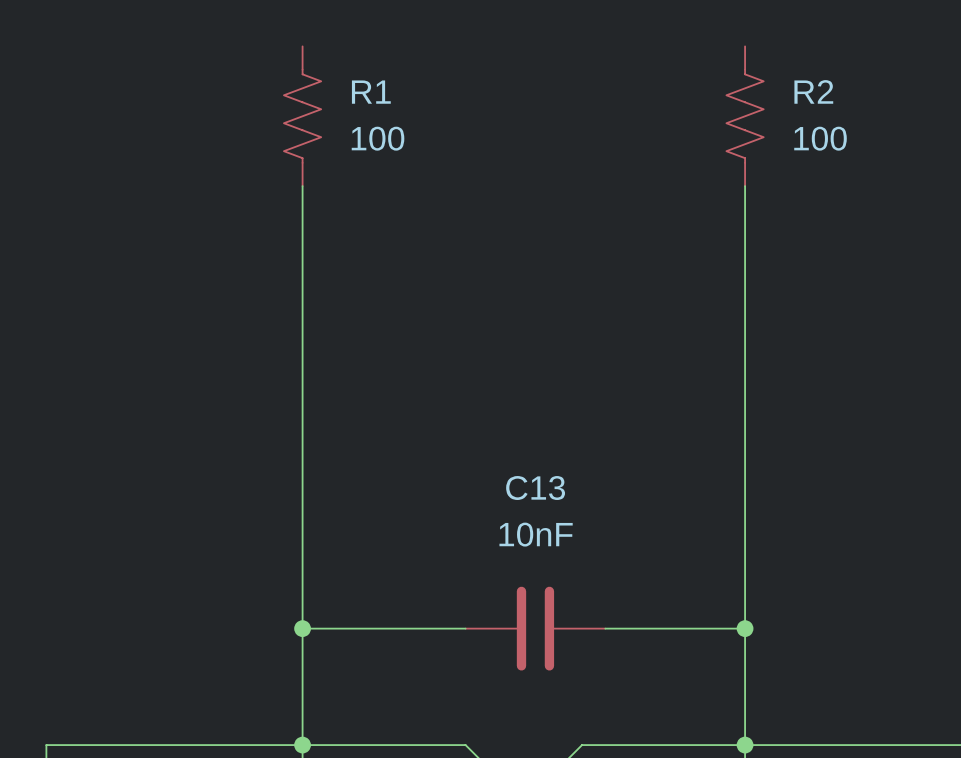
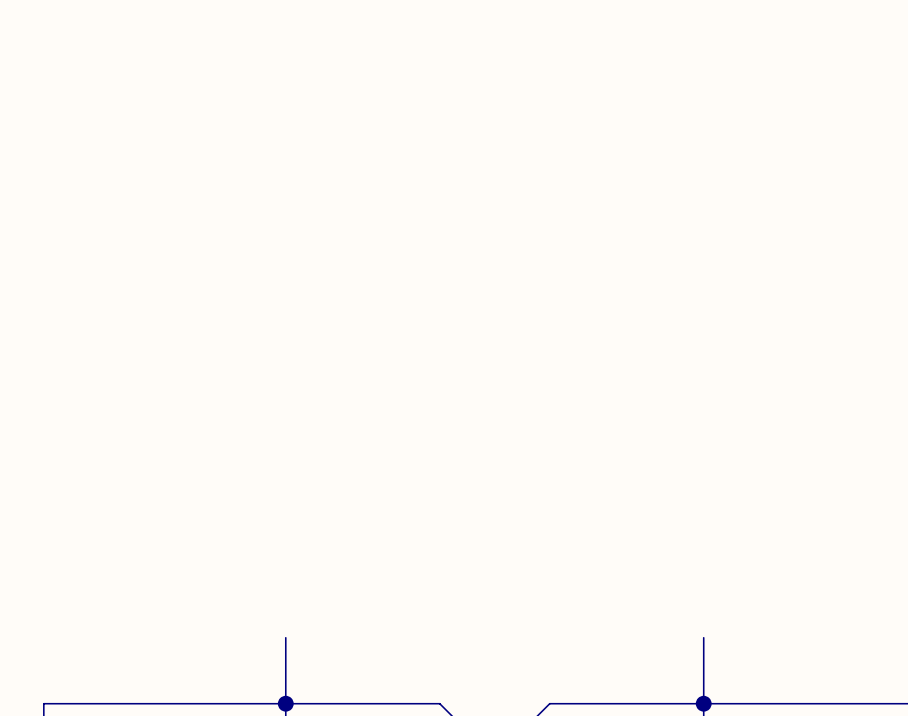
R1: 100 (302, 116) -> none
R2: 100 (745, 116) -> none
wire: (302, 186) (302, 675) -> none
wire: (745, 186) (745, 675) -> none
wire: (302, 628) (465, 628) -> none
junction: (302, 628) -> none
C13: 10nF (535, 628) -> none
wire: (605, 628) (745, 628) -> none
junction: (745, 628) -> none

